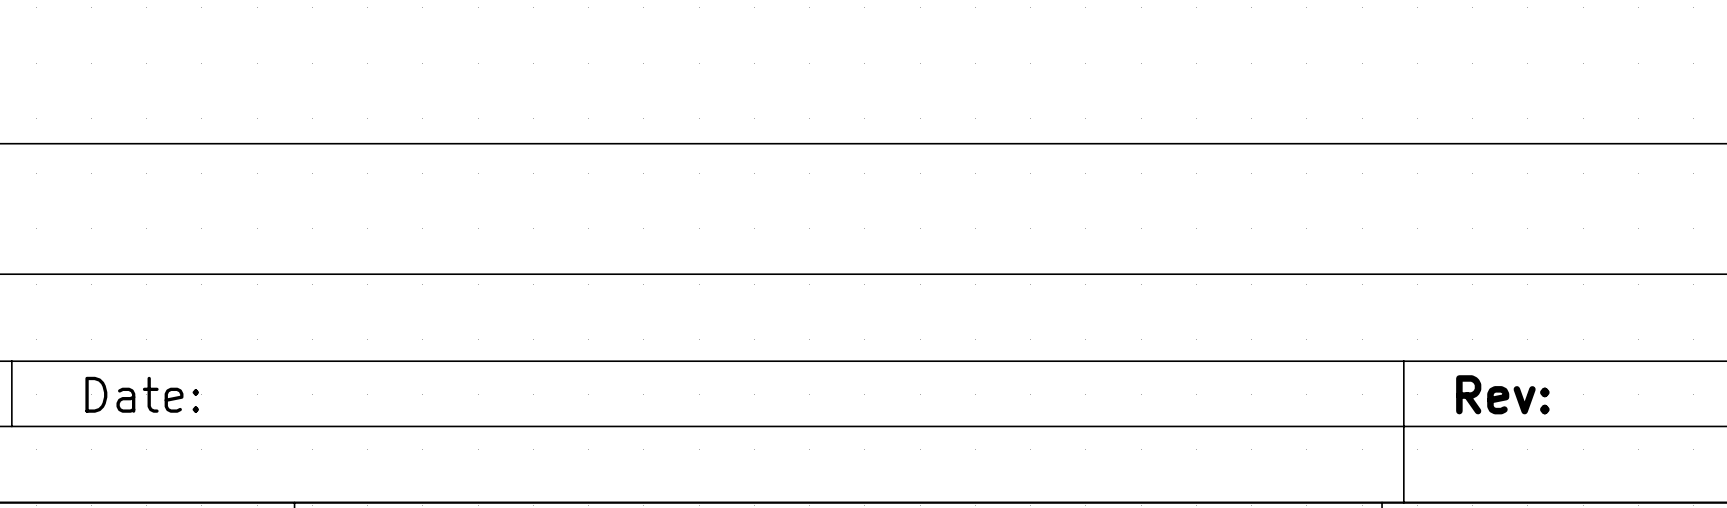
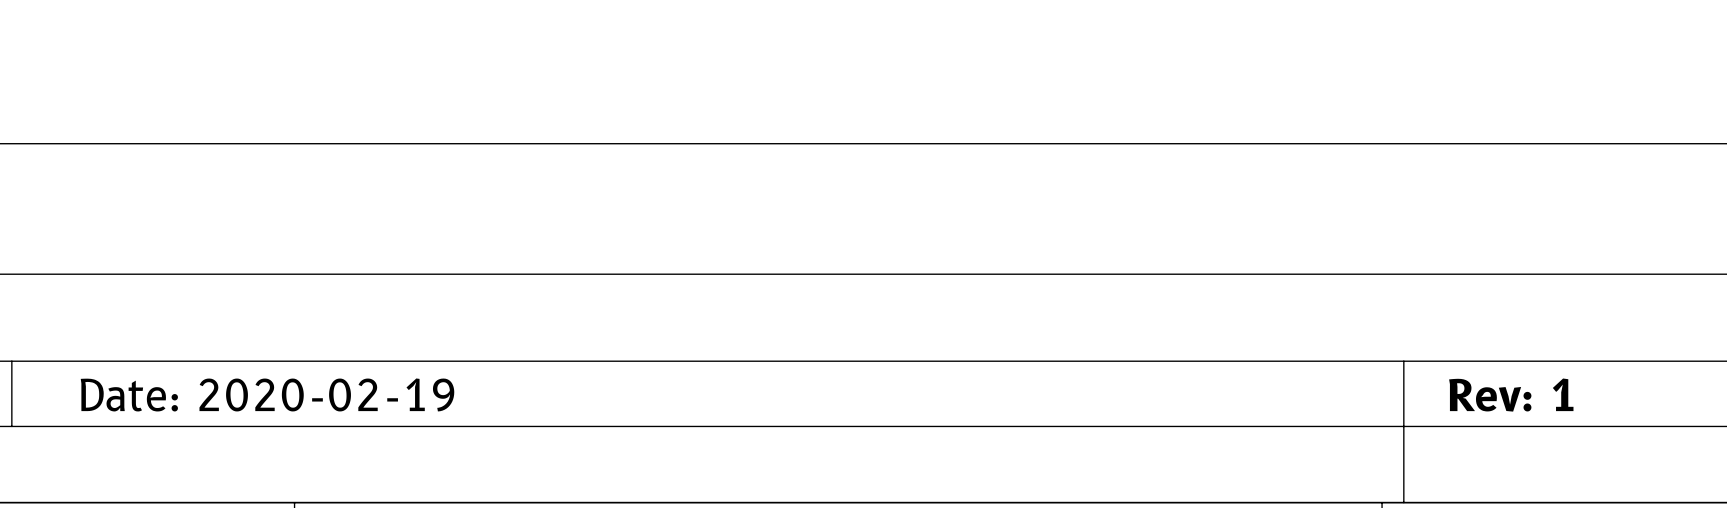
title block: Date: (142, 394) -> Date: 2020-02-19 (267, 394)
title block: Rev: (1502, 394) -> Rev: 1 (1511, 395)

